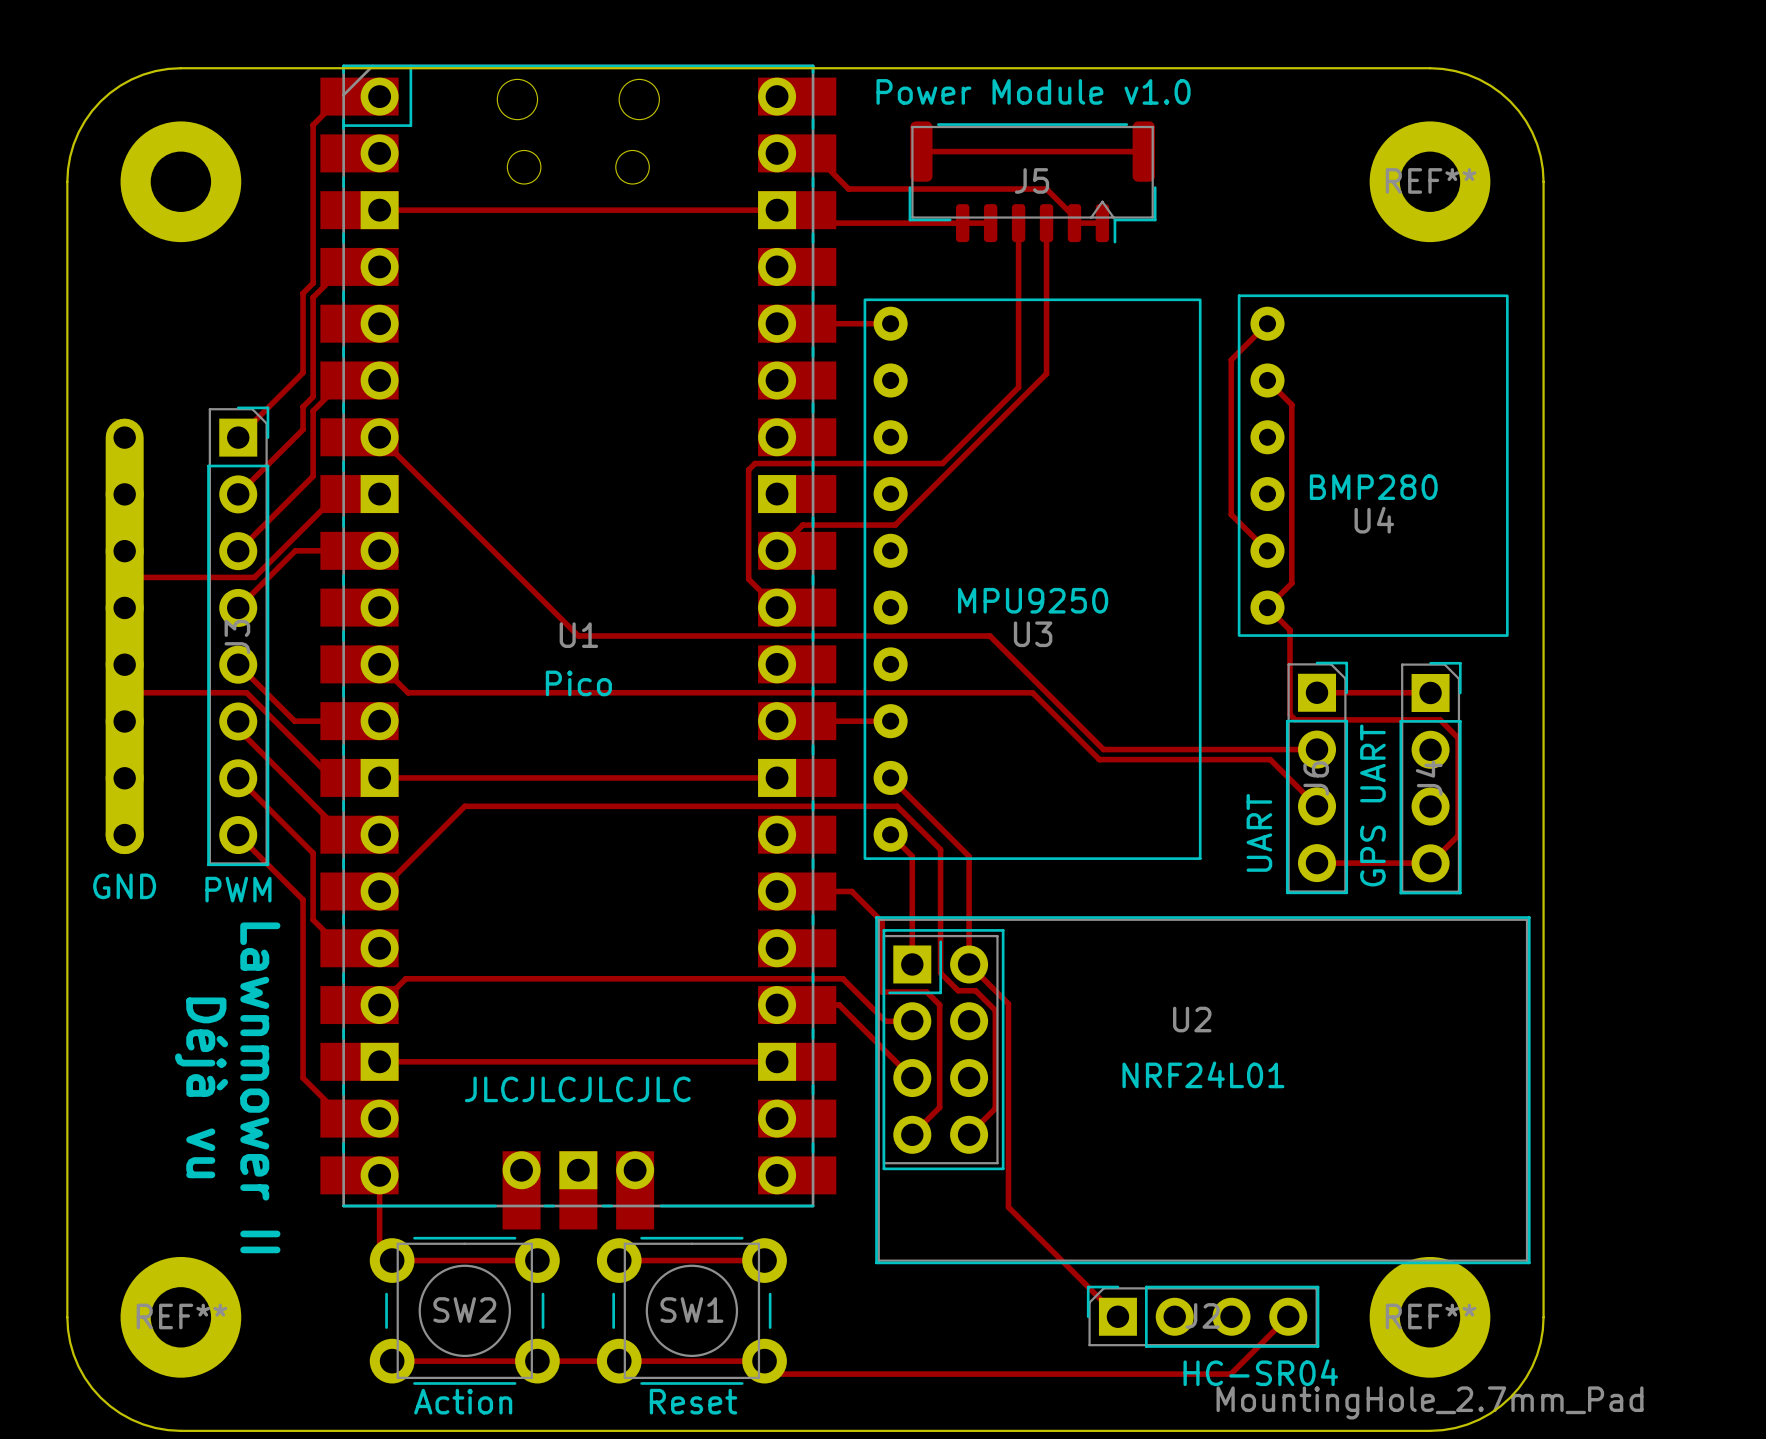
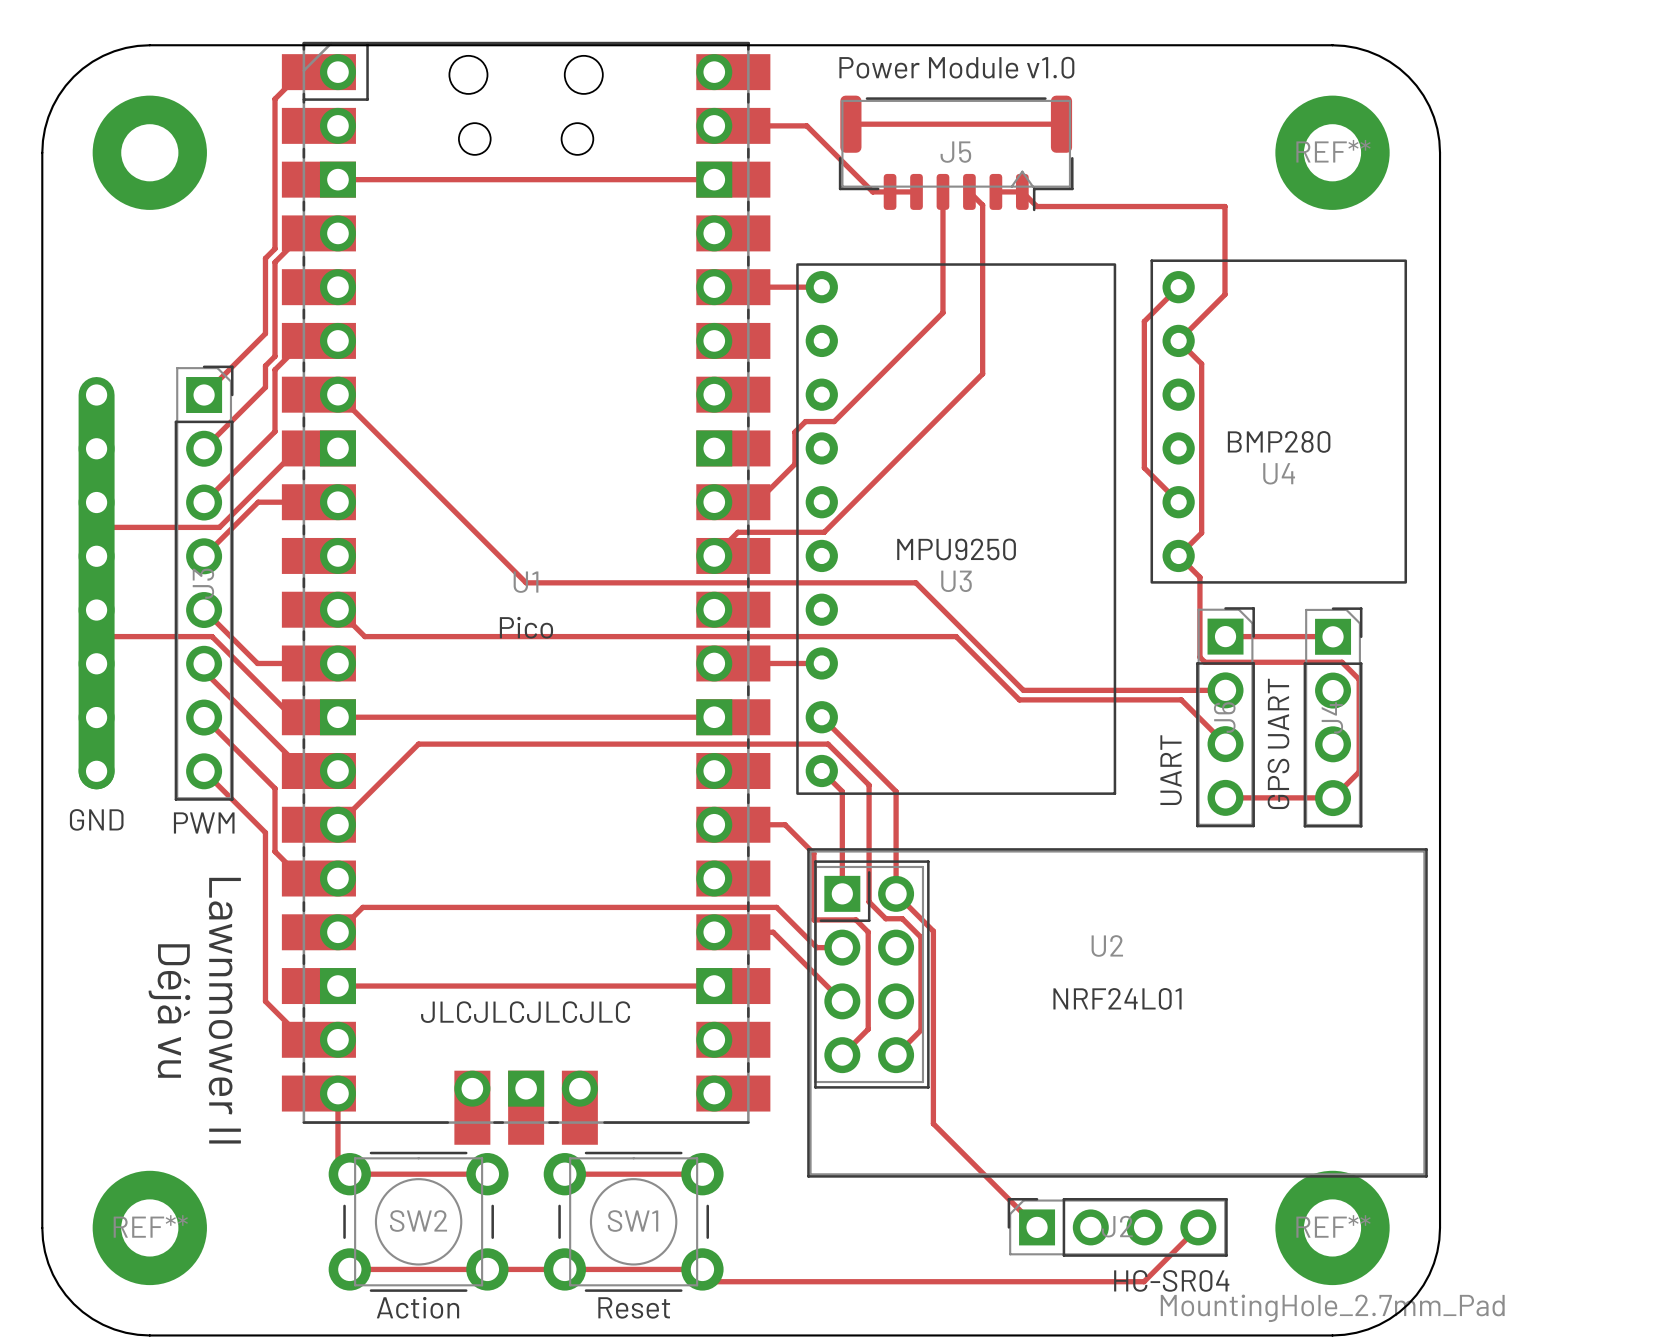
track: (813, 153) (848, 189) (1046, 189) (1074, 217) (1074, 223) -> none
track: (777, 210) (790, 223) (944, 223) -> (748, 125) (806, 125) (872, 191)
track: (1046, 223) (1046, 373) (895, 525) (802, 525) (777, 550) -> (969, 191) (982, 205) (982, 373) (824, 532) (737, 532) (714, 555)
track: none -> (1022, 191) (1036, 206) (1224, 206) (1224, 294) (1178, 340)
track: (1018, 350) (1018, 387) (942, 463) (755, 463) (748, 469) (748, 579) (777, 607) -> (942, 312) (834, 421) (805, 421) (794, 432) (794, 464) (756, 502) (714, 502)

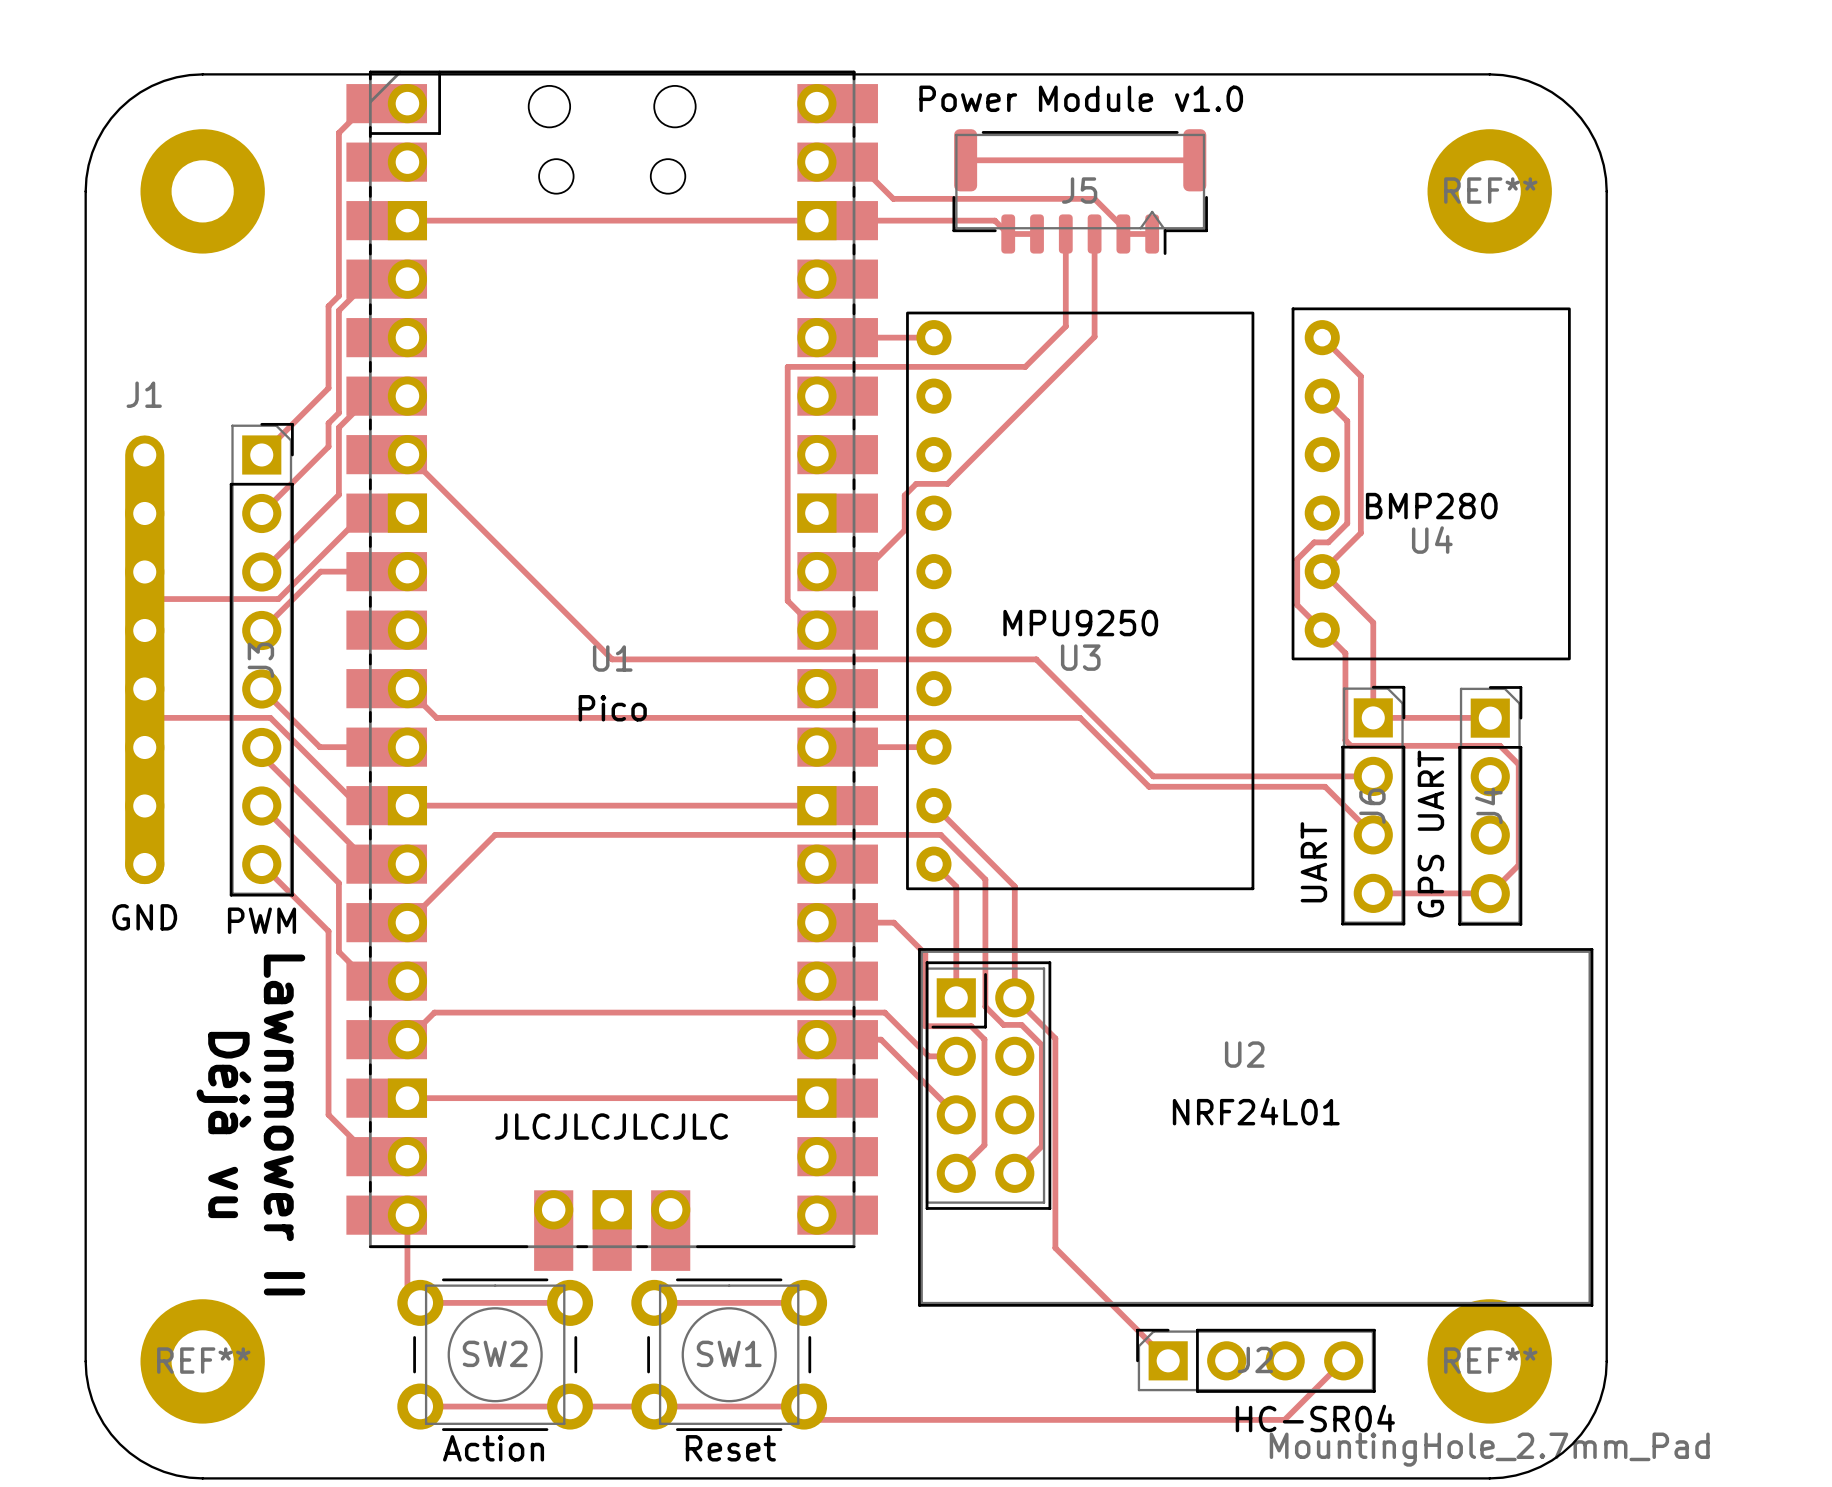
track: (750, 125) (806, 125) (872, 191) (890, 191) -> (816, 220) (994, 220) (1008, 233)
track: none -> (856, 162) (893, 198) (1094, 198) (1123, 227) (1123, 233)
track: (969, 191) (982, 205) (982, 373) (824, 532) (737, 532) (714, 555) -> (1065, 326) (1025, 366) (787, 366) (787, 600) (816, 630)
track: (1022, 191) (1036, 206) (1224, 206) (1224, 294) (1178, 340) -> none
track: (942, 276) (942, 312) -> (1094, 233) (1094, 336) (1065, 365)
track: (1178, 287) (1144, 321) (1144, 467) (1178, 502) -> (1322, 337) (1360, 376) (1360, 533) (1322, 571) (1373, 622) (1373, 717)
J1 name: none -> J1 (144, 394)
track: (1201, 457) (1201, 532) (1178, 555) -> (1347, 523) (1328, 542) (1314, 542) (1297, 559) (1297, 605) (1322, 630)

